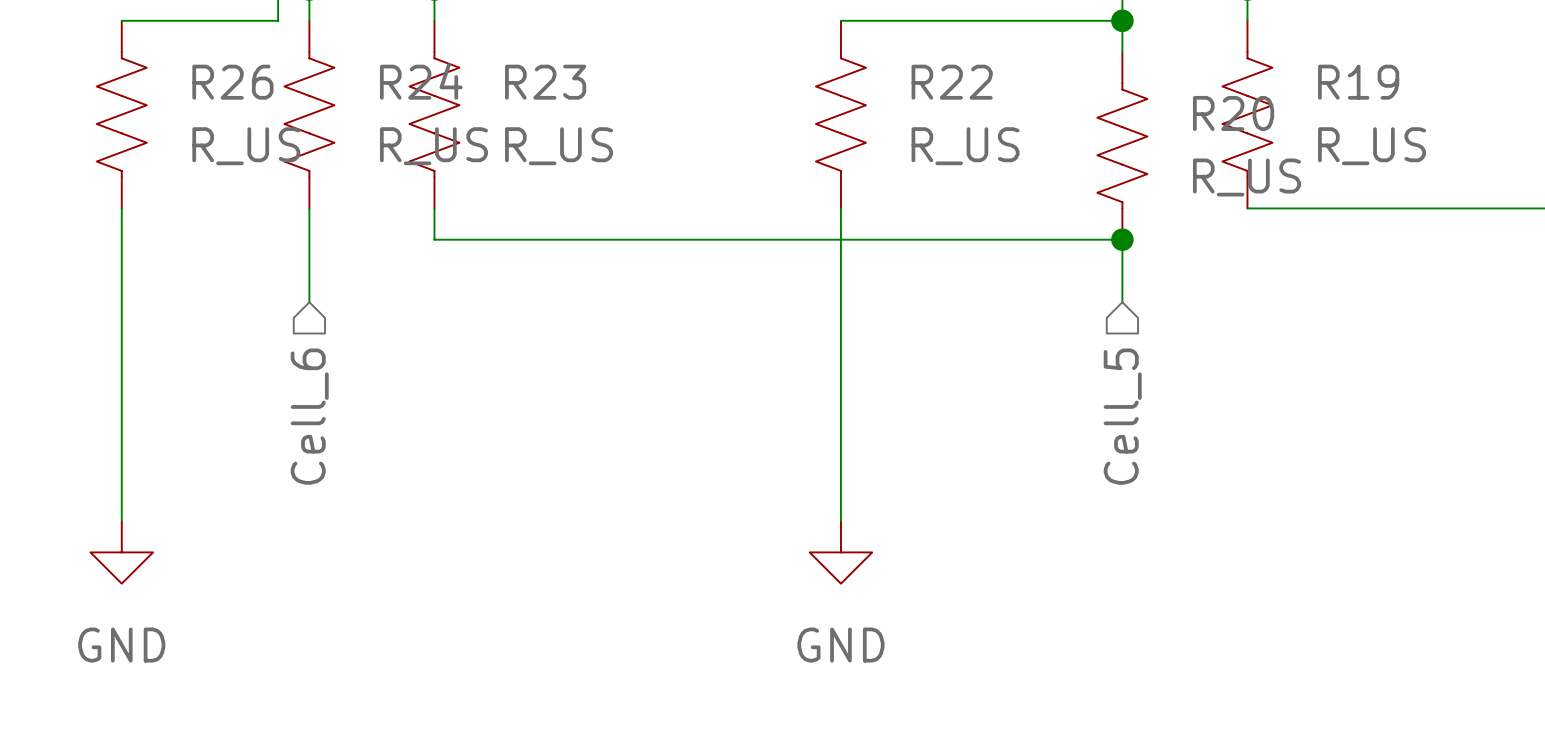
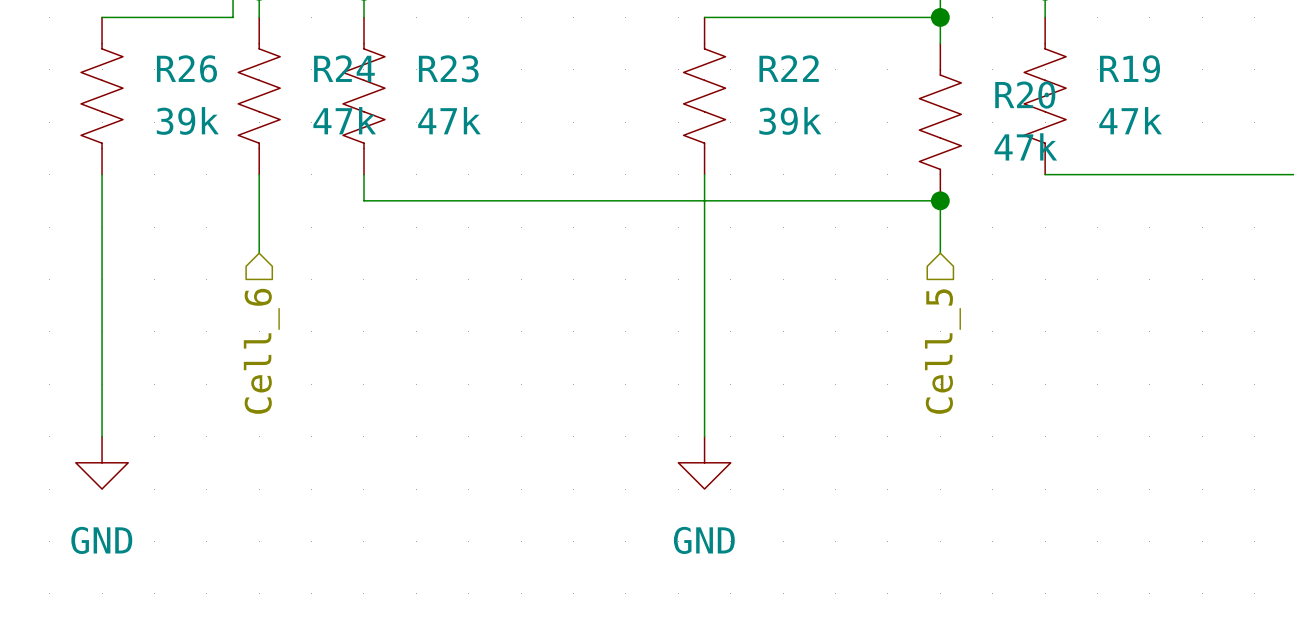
R26 value: R_US (246, 146) -> 39k (187, 120)
R24 value: R_US (433, 146) -> 47k (344, 120)
R23 value: R_US (559, 146) -> 47k (449, 120)
R22 value: R_US (965, 146) -> 39k (790, 120)
R19 value: R_US (1372, 146) -> 47k (1130, 120)
R20 value: R_US (1246, 177) -> 47k (1025, 146)

